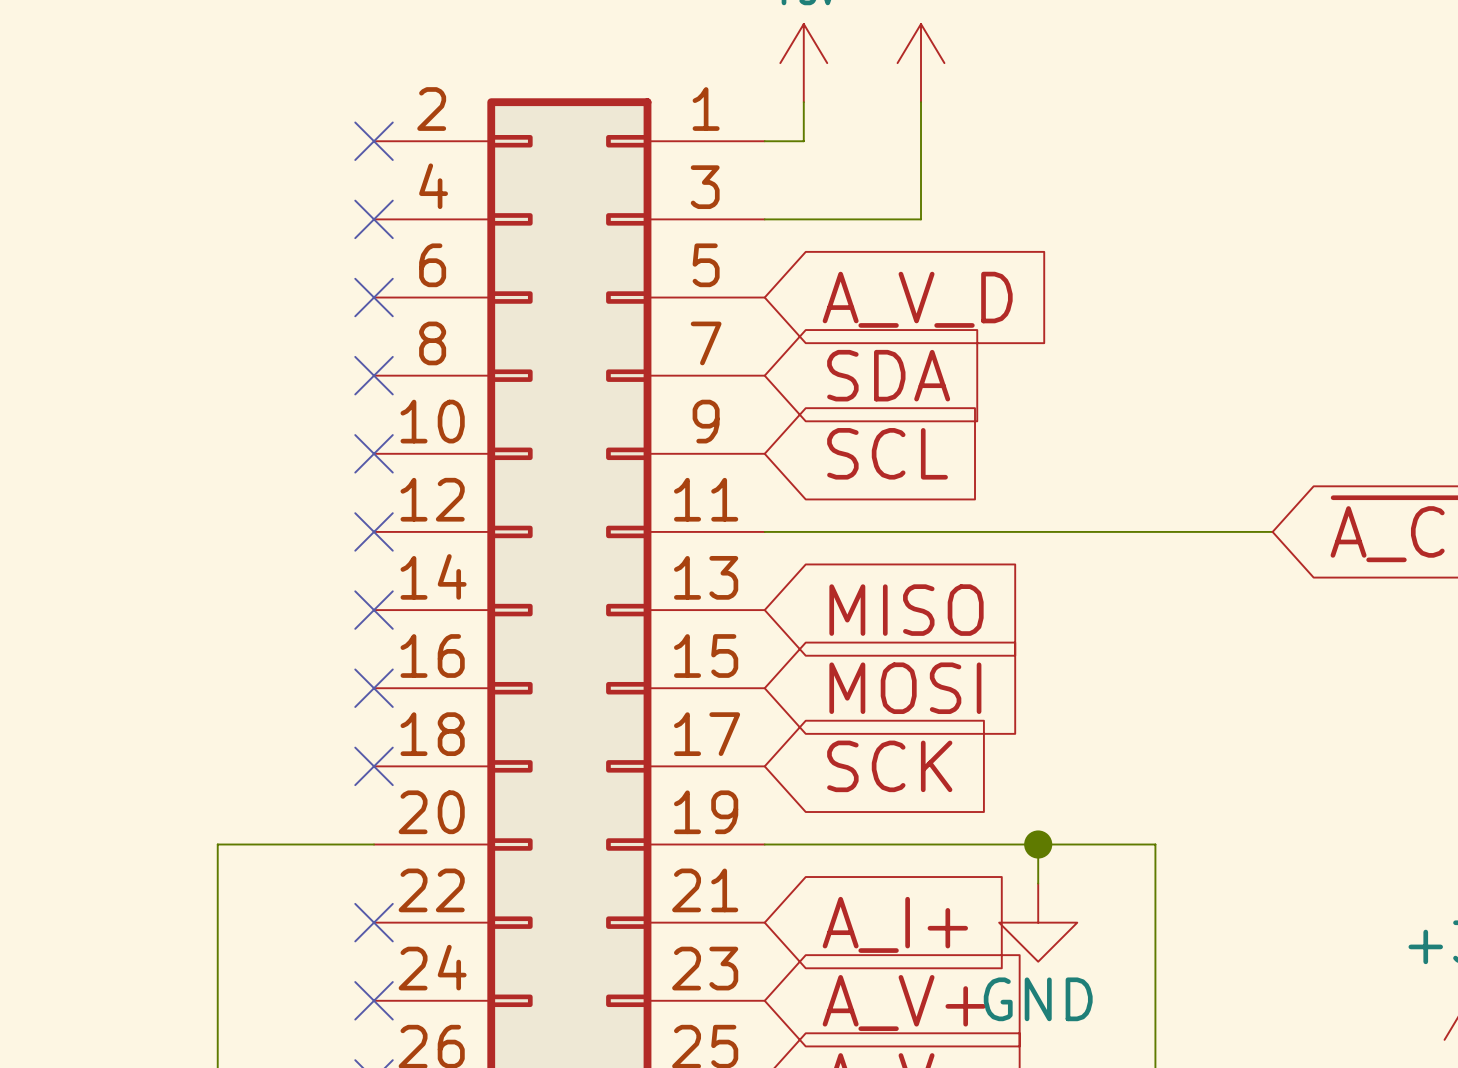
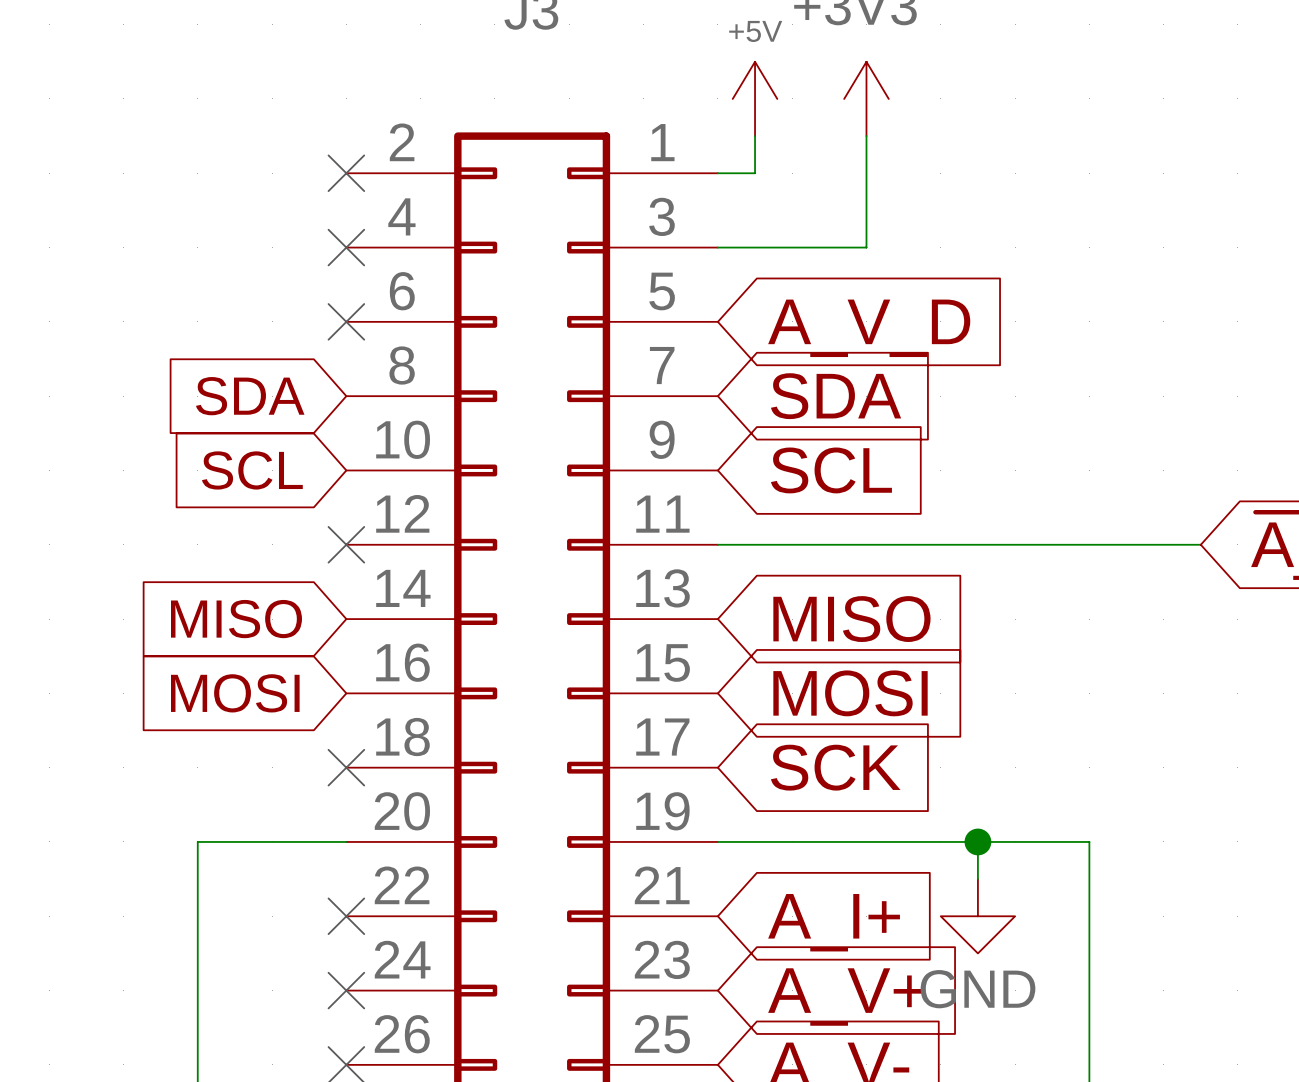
global label: none -> SDA (250, 396)
no-connect mark: (374, 375) -> none
global label: none -> SCL (252, 470)
no-connect mark: (374, 453) -> none
global label: none -> MISO (236, 619)
no-connect mark: (374, 610) -> none
global label: none -> MOSI (235, 693)
no-connect mark: (374, 688) -> none

